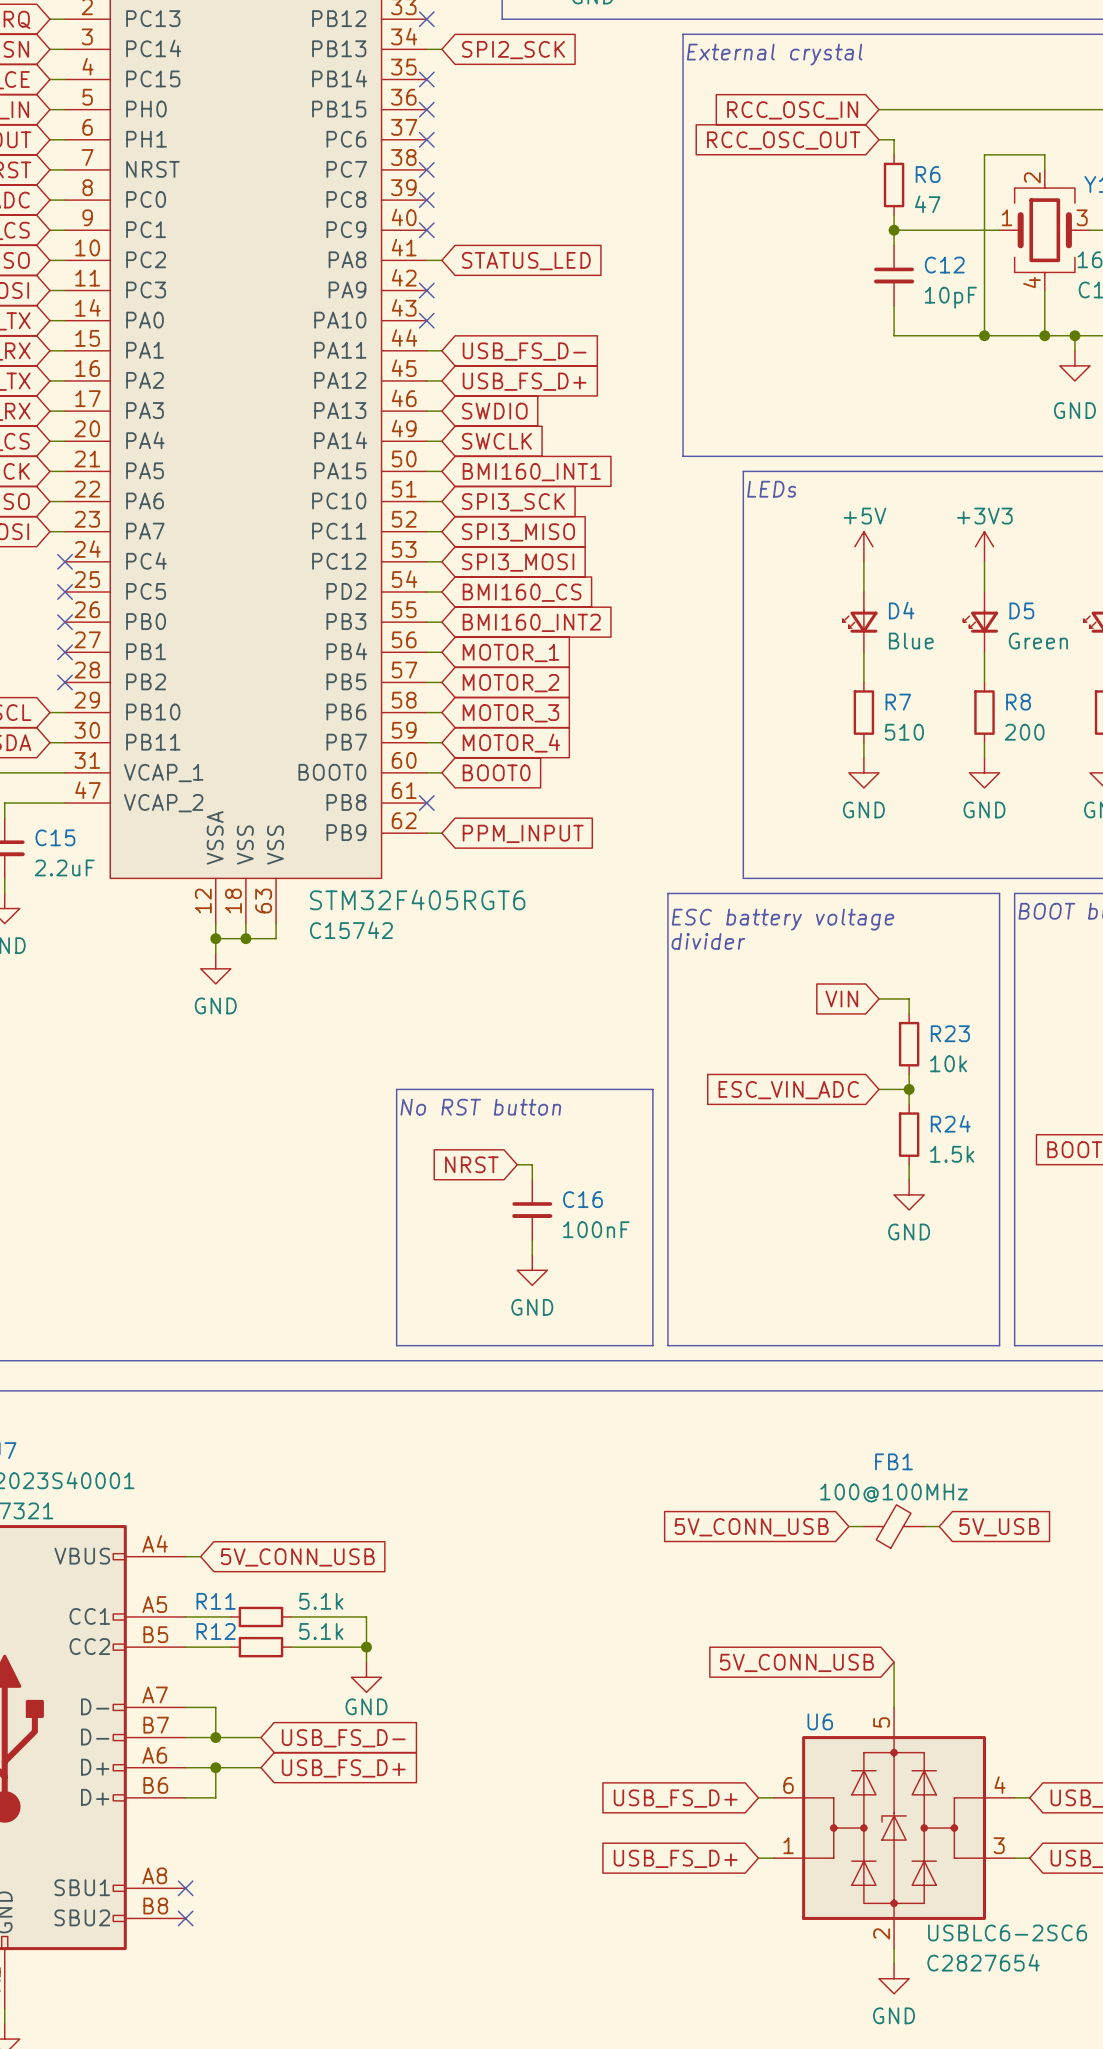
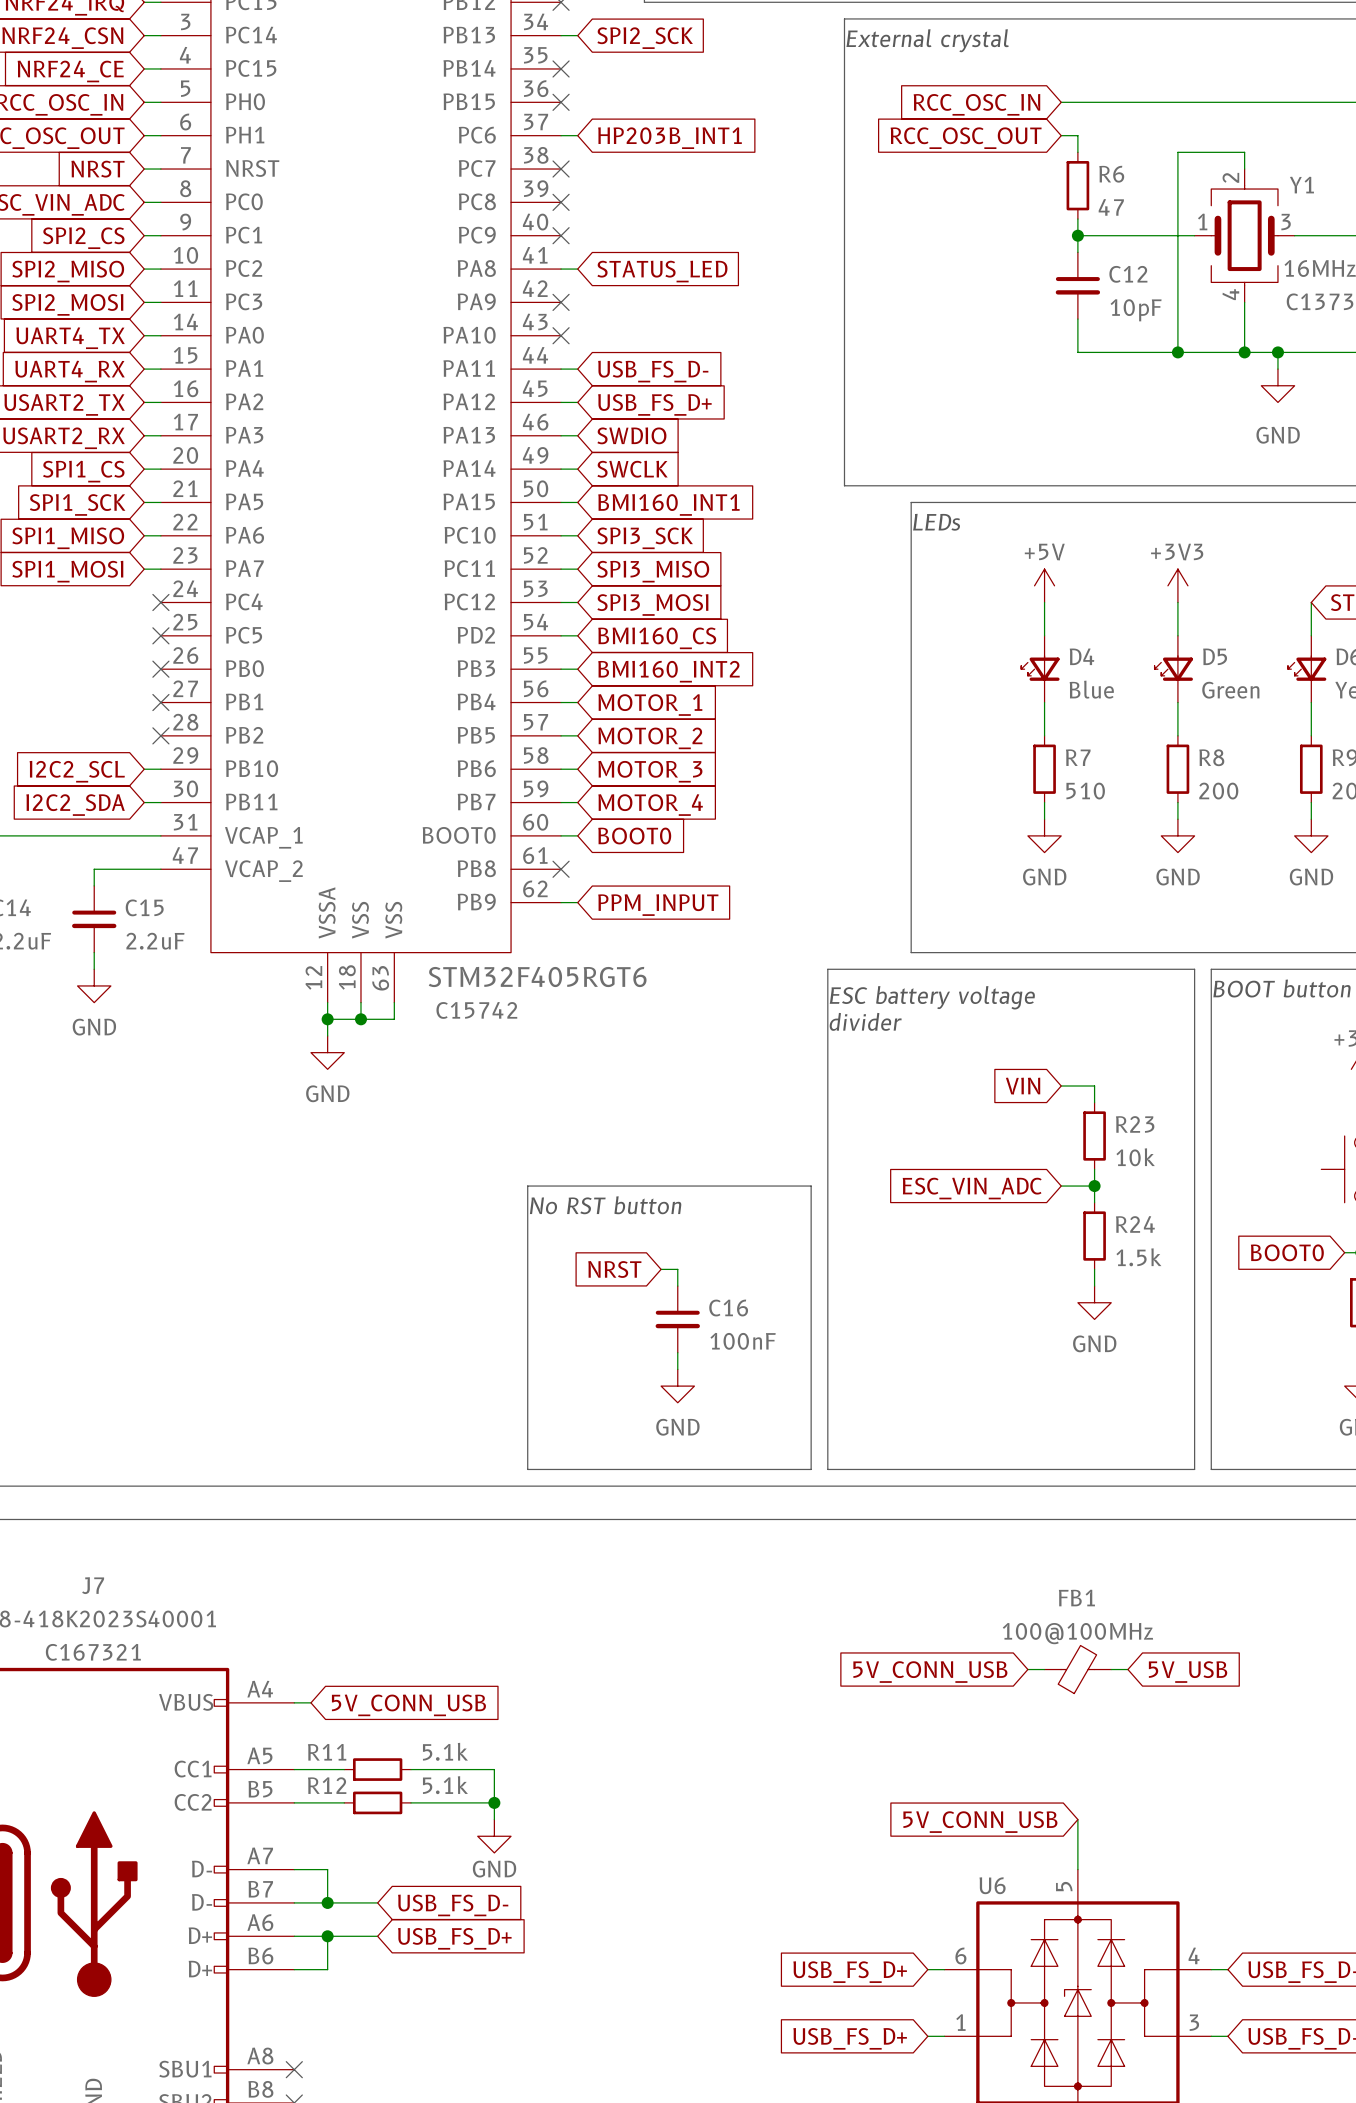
wire: none -> (561, 135) (577, 135)
no-connect mark: (426, 139) -> none
global label: none -> HP203B_INT1 (669, 138)

